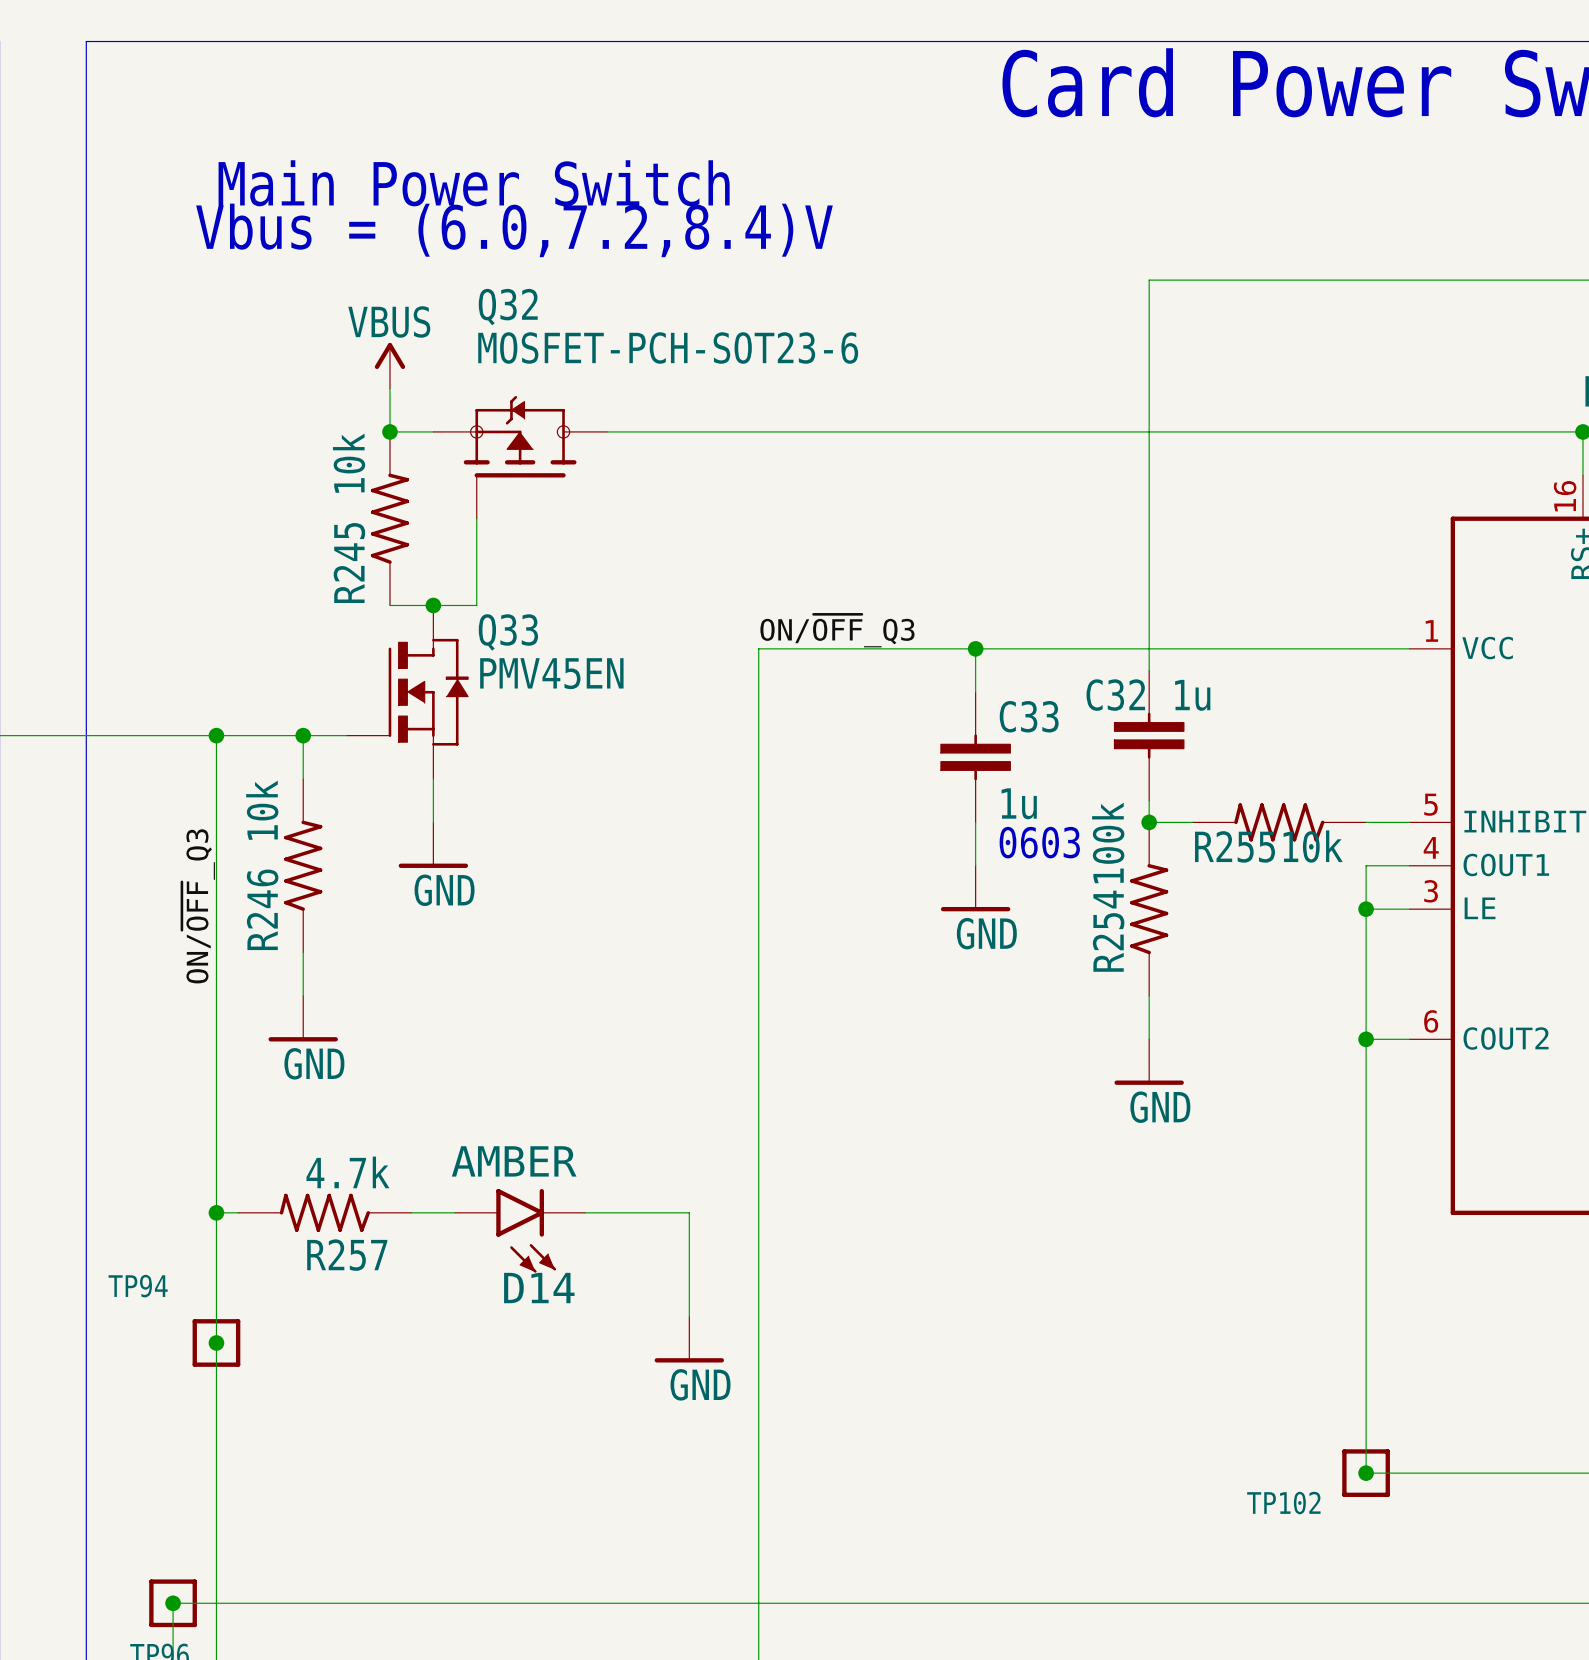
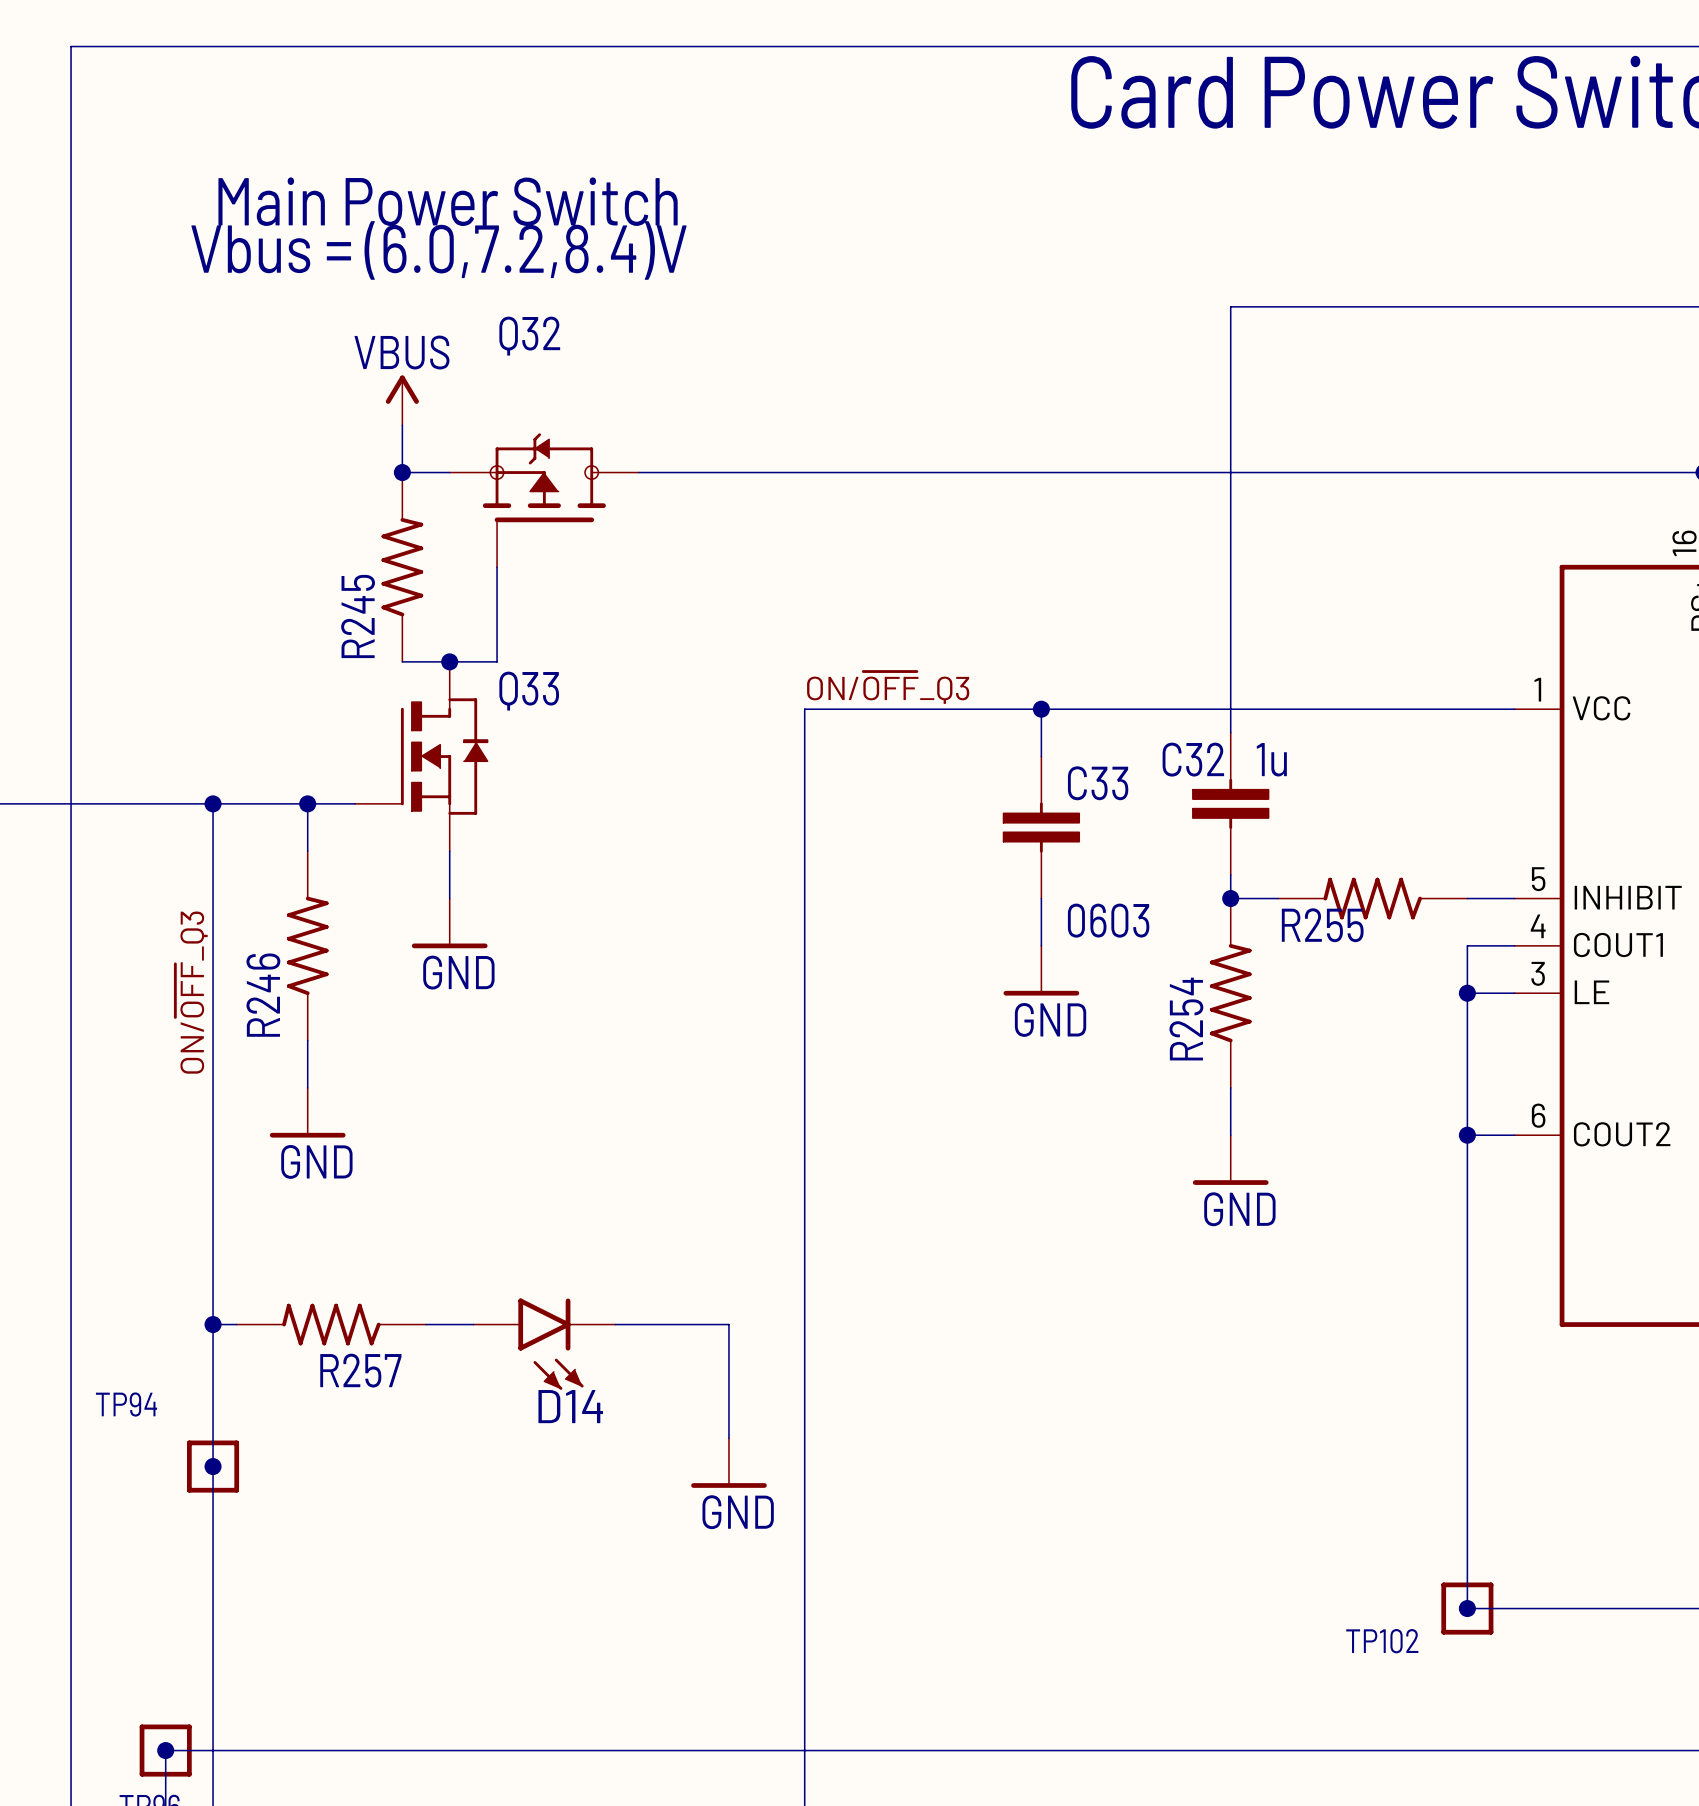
Q32 value: MOSFET-PCH-SOT23-6 (668, 348) -> none
R245 value: 10k (349, 463) -> none
Q33 value: PMV45EN (551, 673) -> none
C33 value: 1u (1019, 803) -> none
R246 value: 10k (262, 810) -> none
R254 value: 100k (1108, 842) -> none
R255 value: 10k (1313, 846) -> none
D14 value: AMBER (514, 1161) -> none
R257 value: 4.7k (347, 1172) -> none

